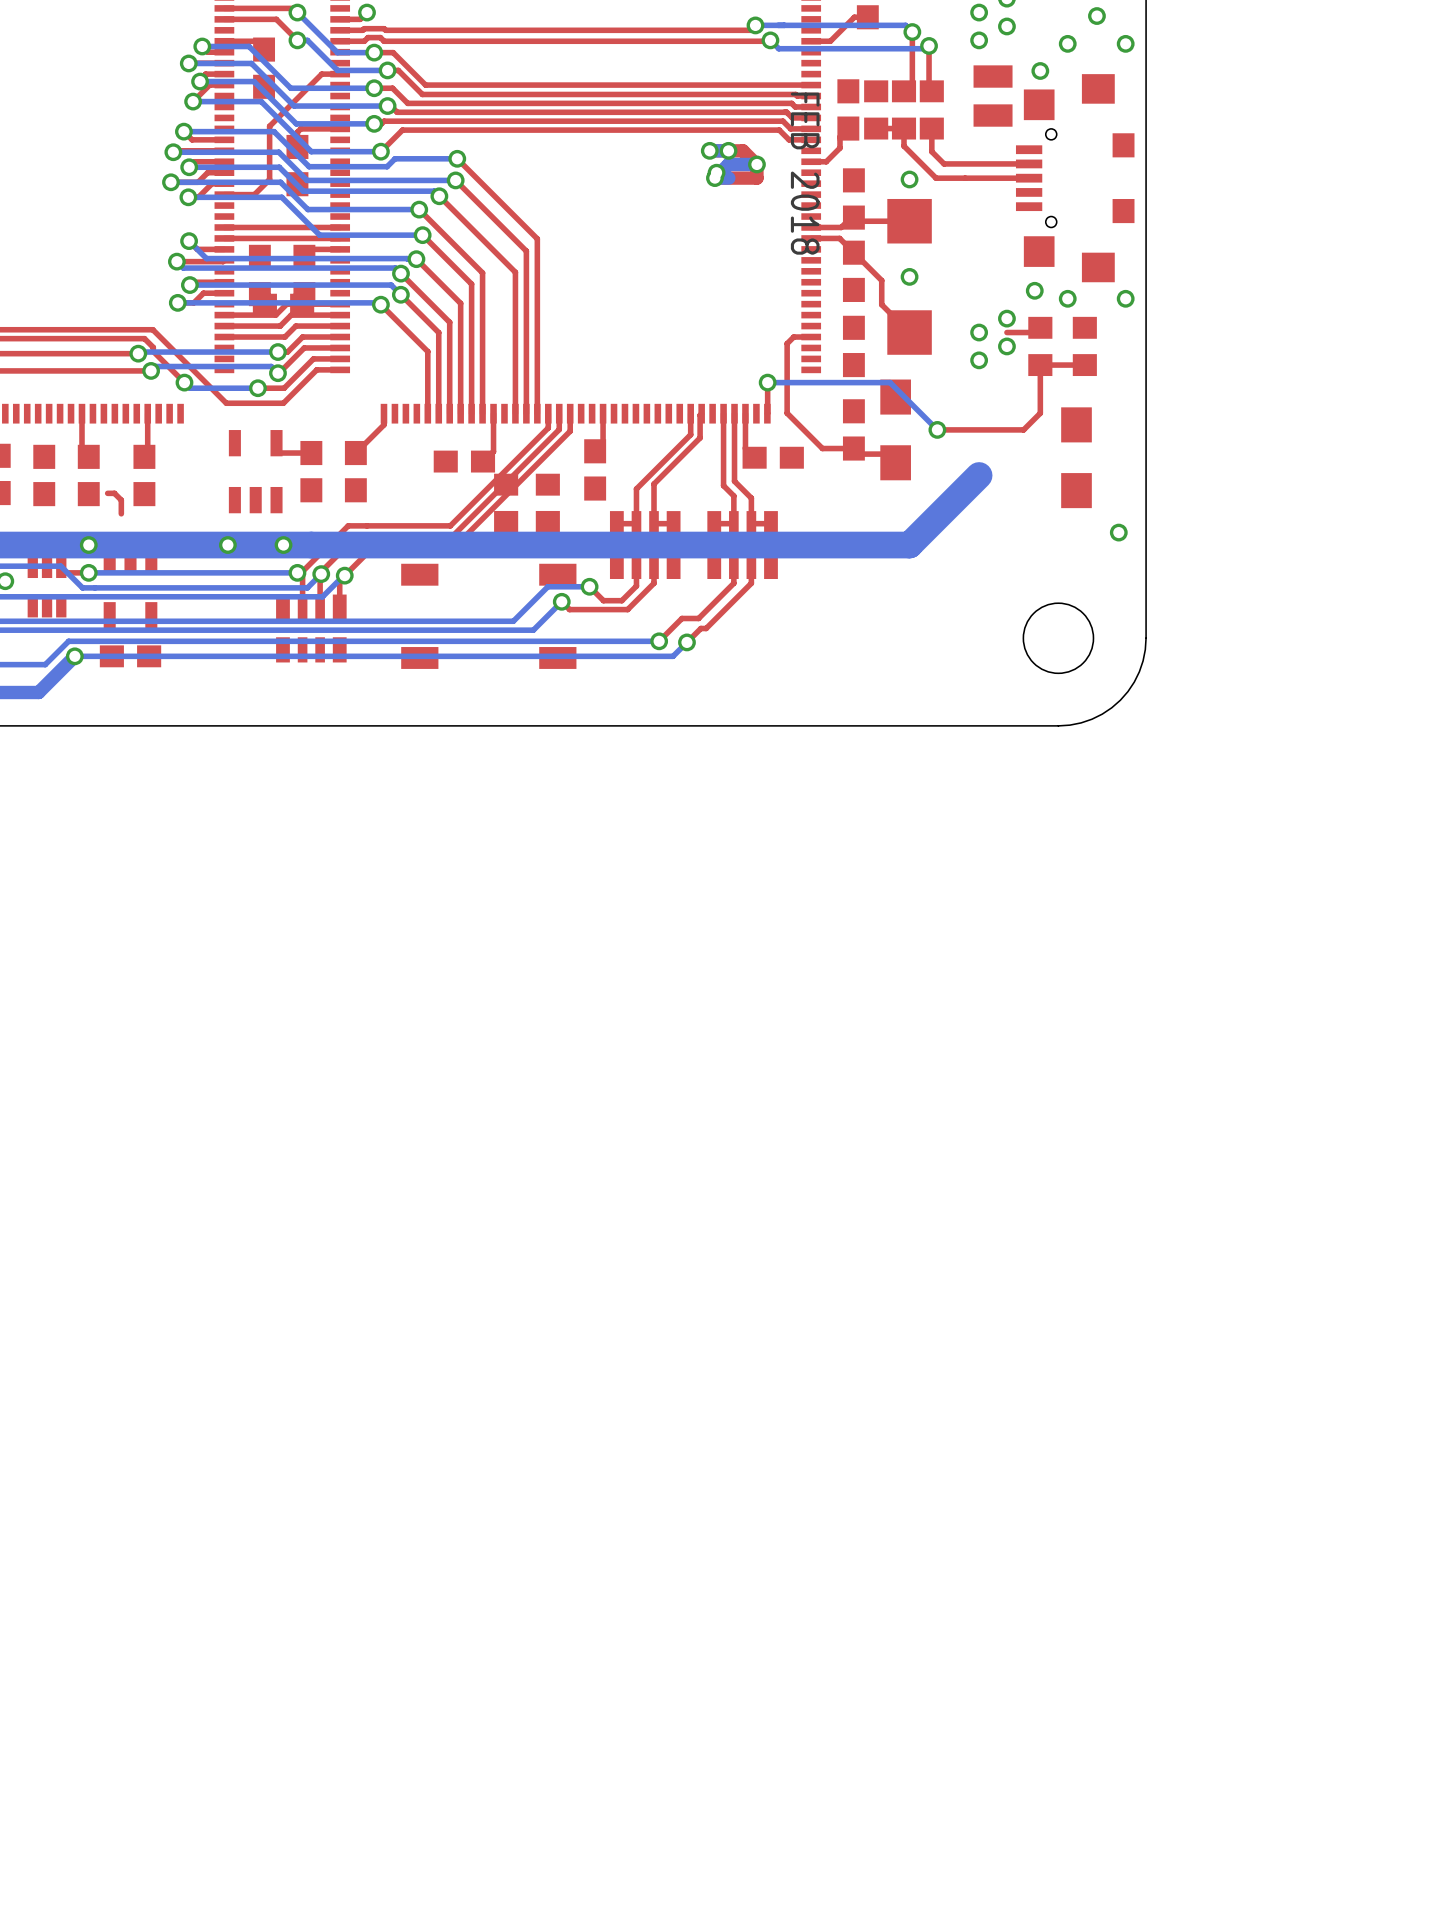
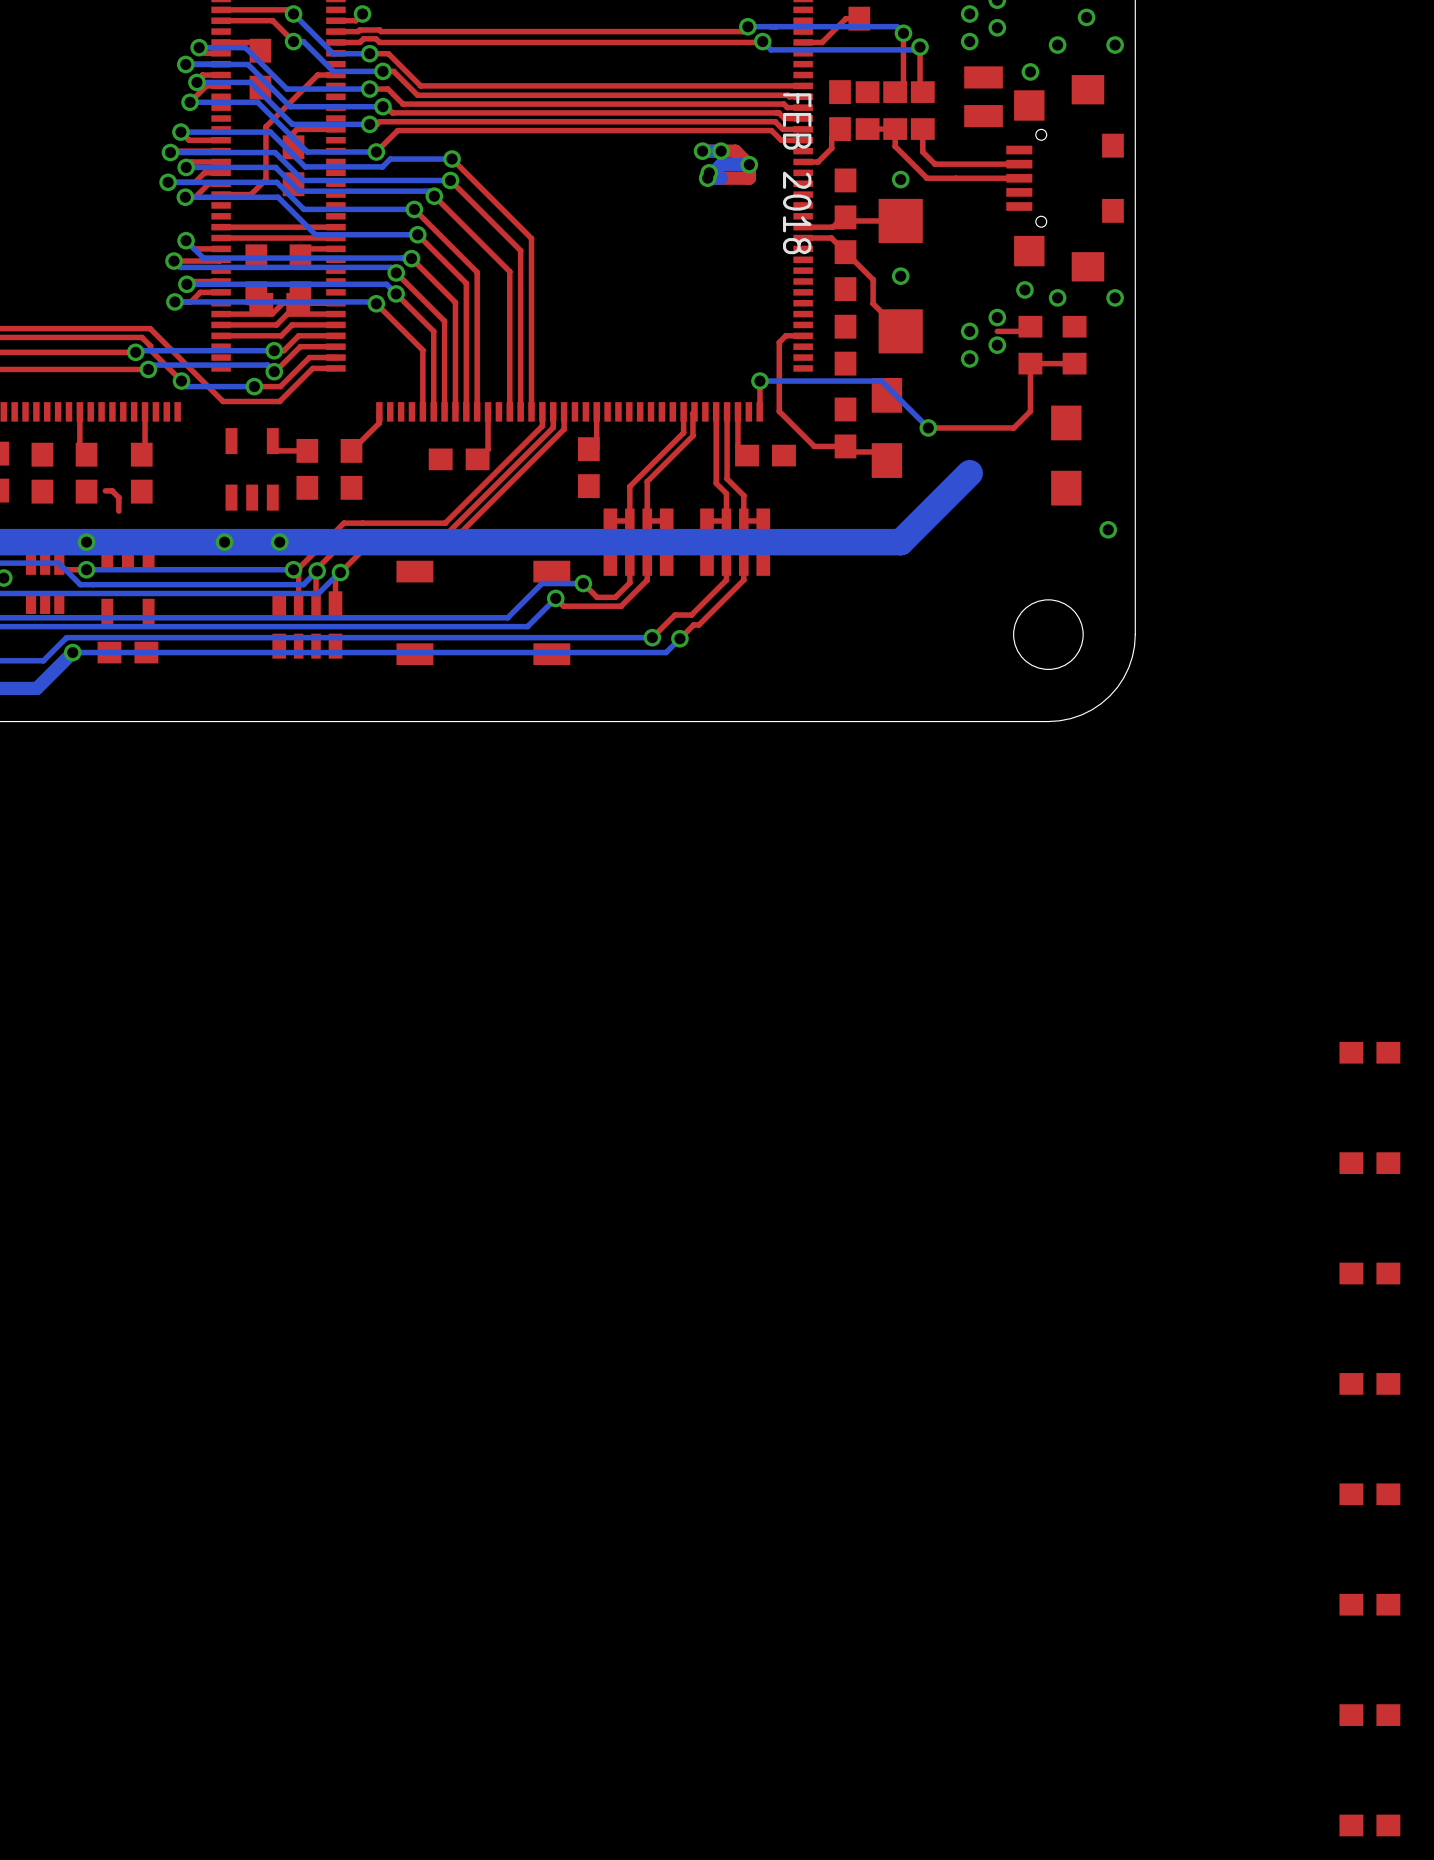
part: (506, 503) -> none
part: (547, 503) -> none
part: none -> (1369, 1052)
part: none -> (1369, 1163)
part: none -> (1369, 1273)
part: none -> (1369, 1383)
part: none -> (1369, 1494)
part: none -> (1369, 1604)
part: none -> (1369, 1715)
part: none -> (1369, 1825)

